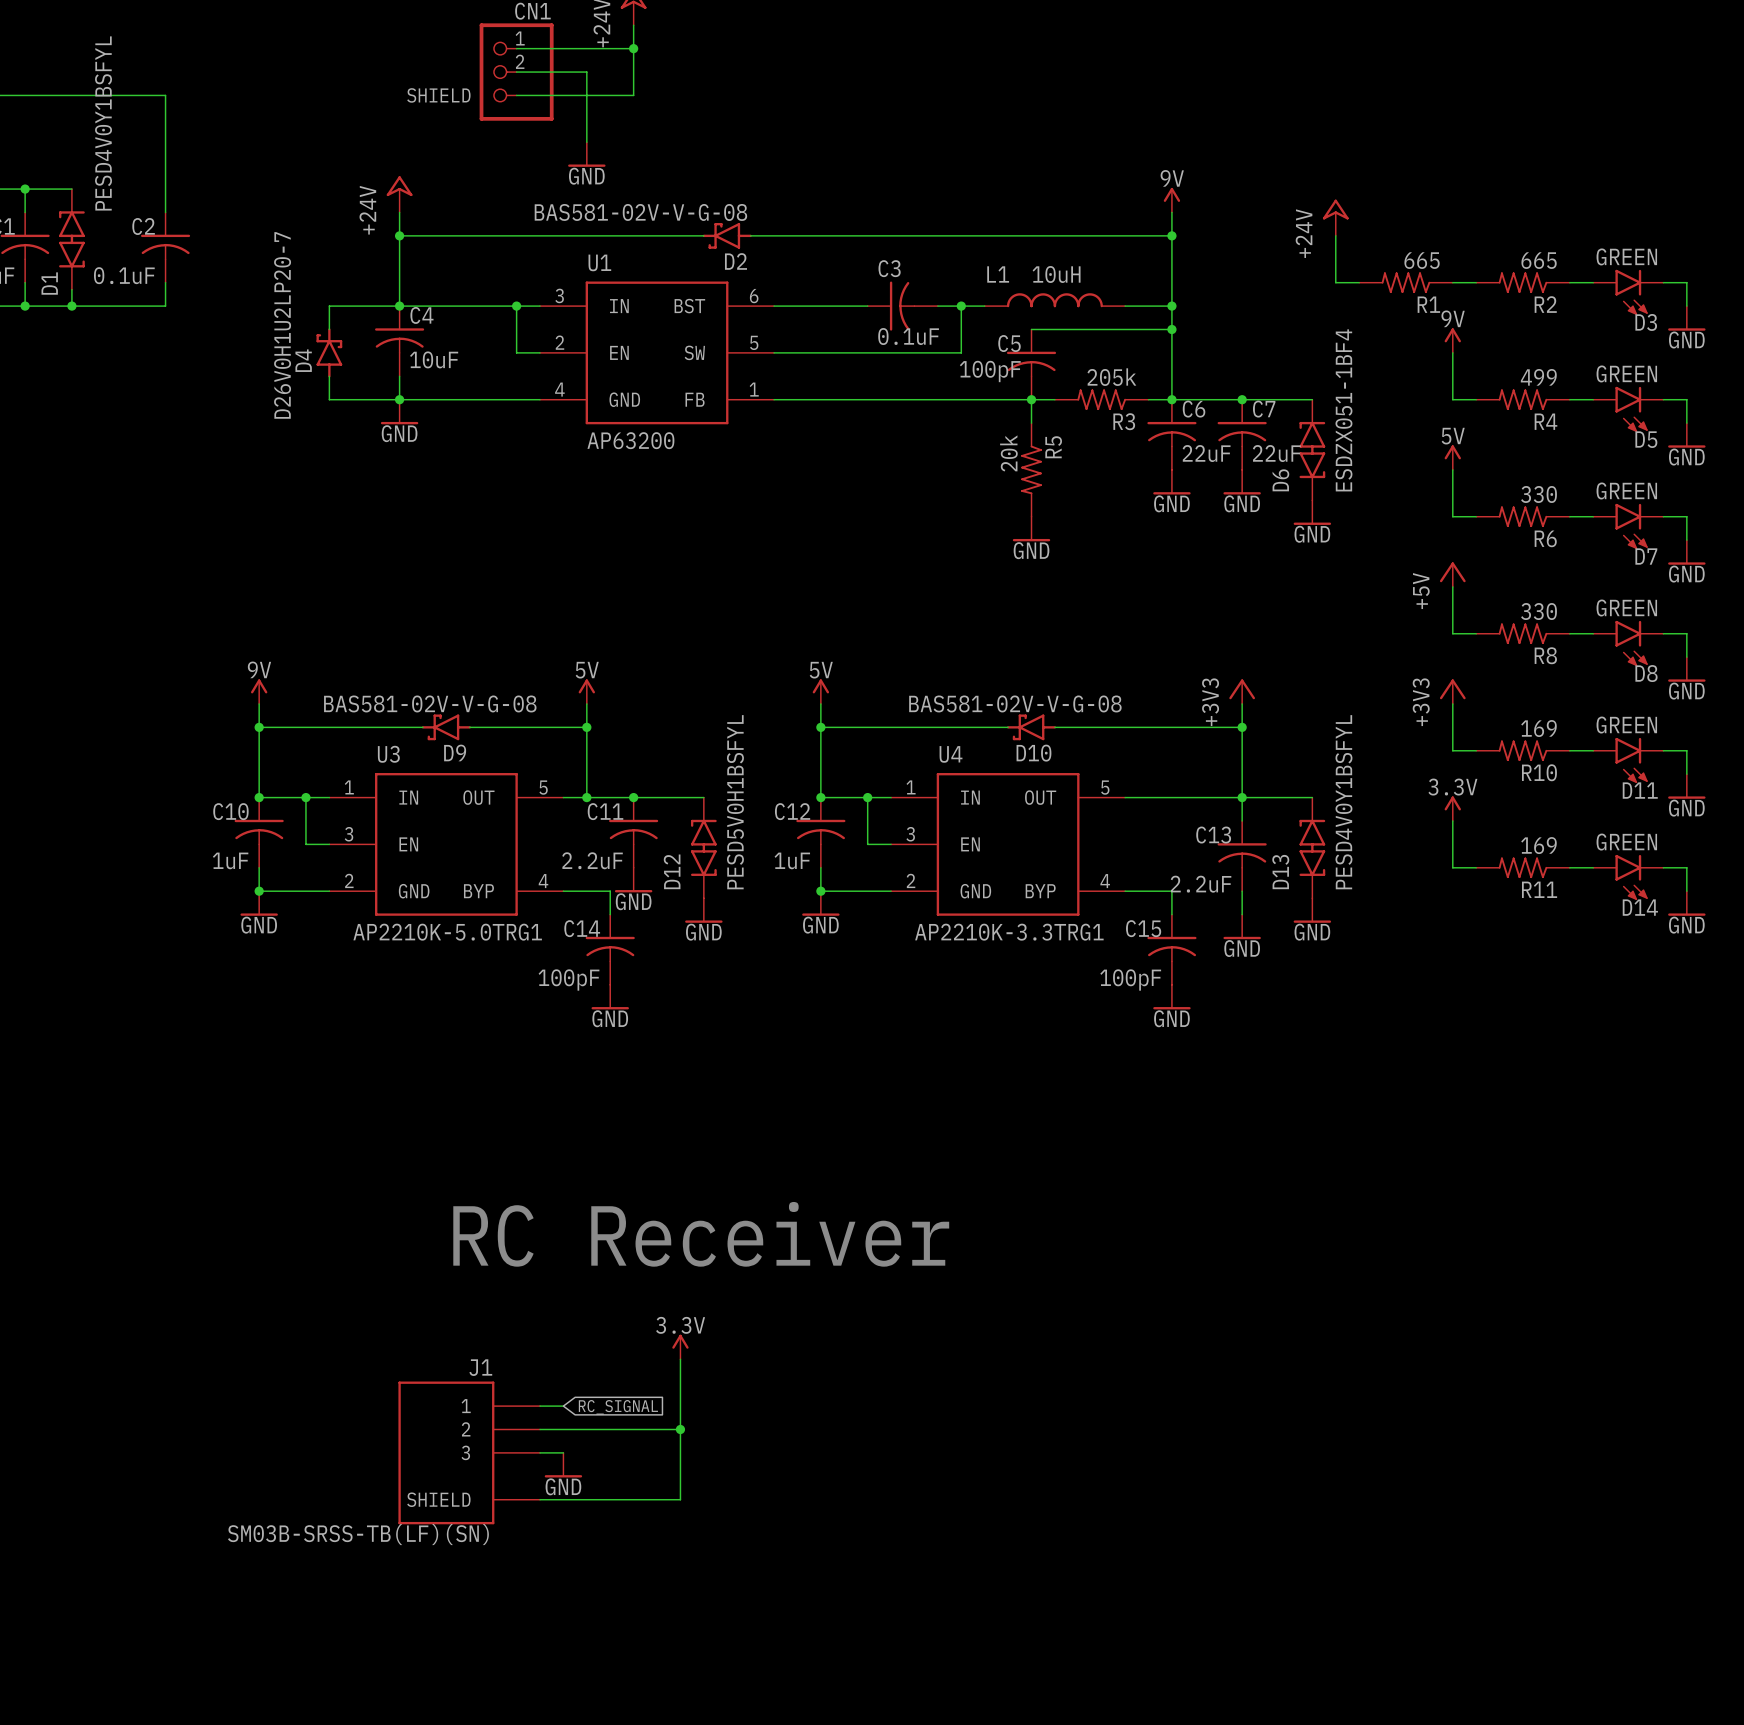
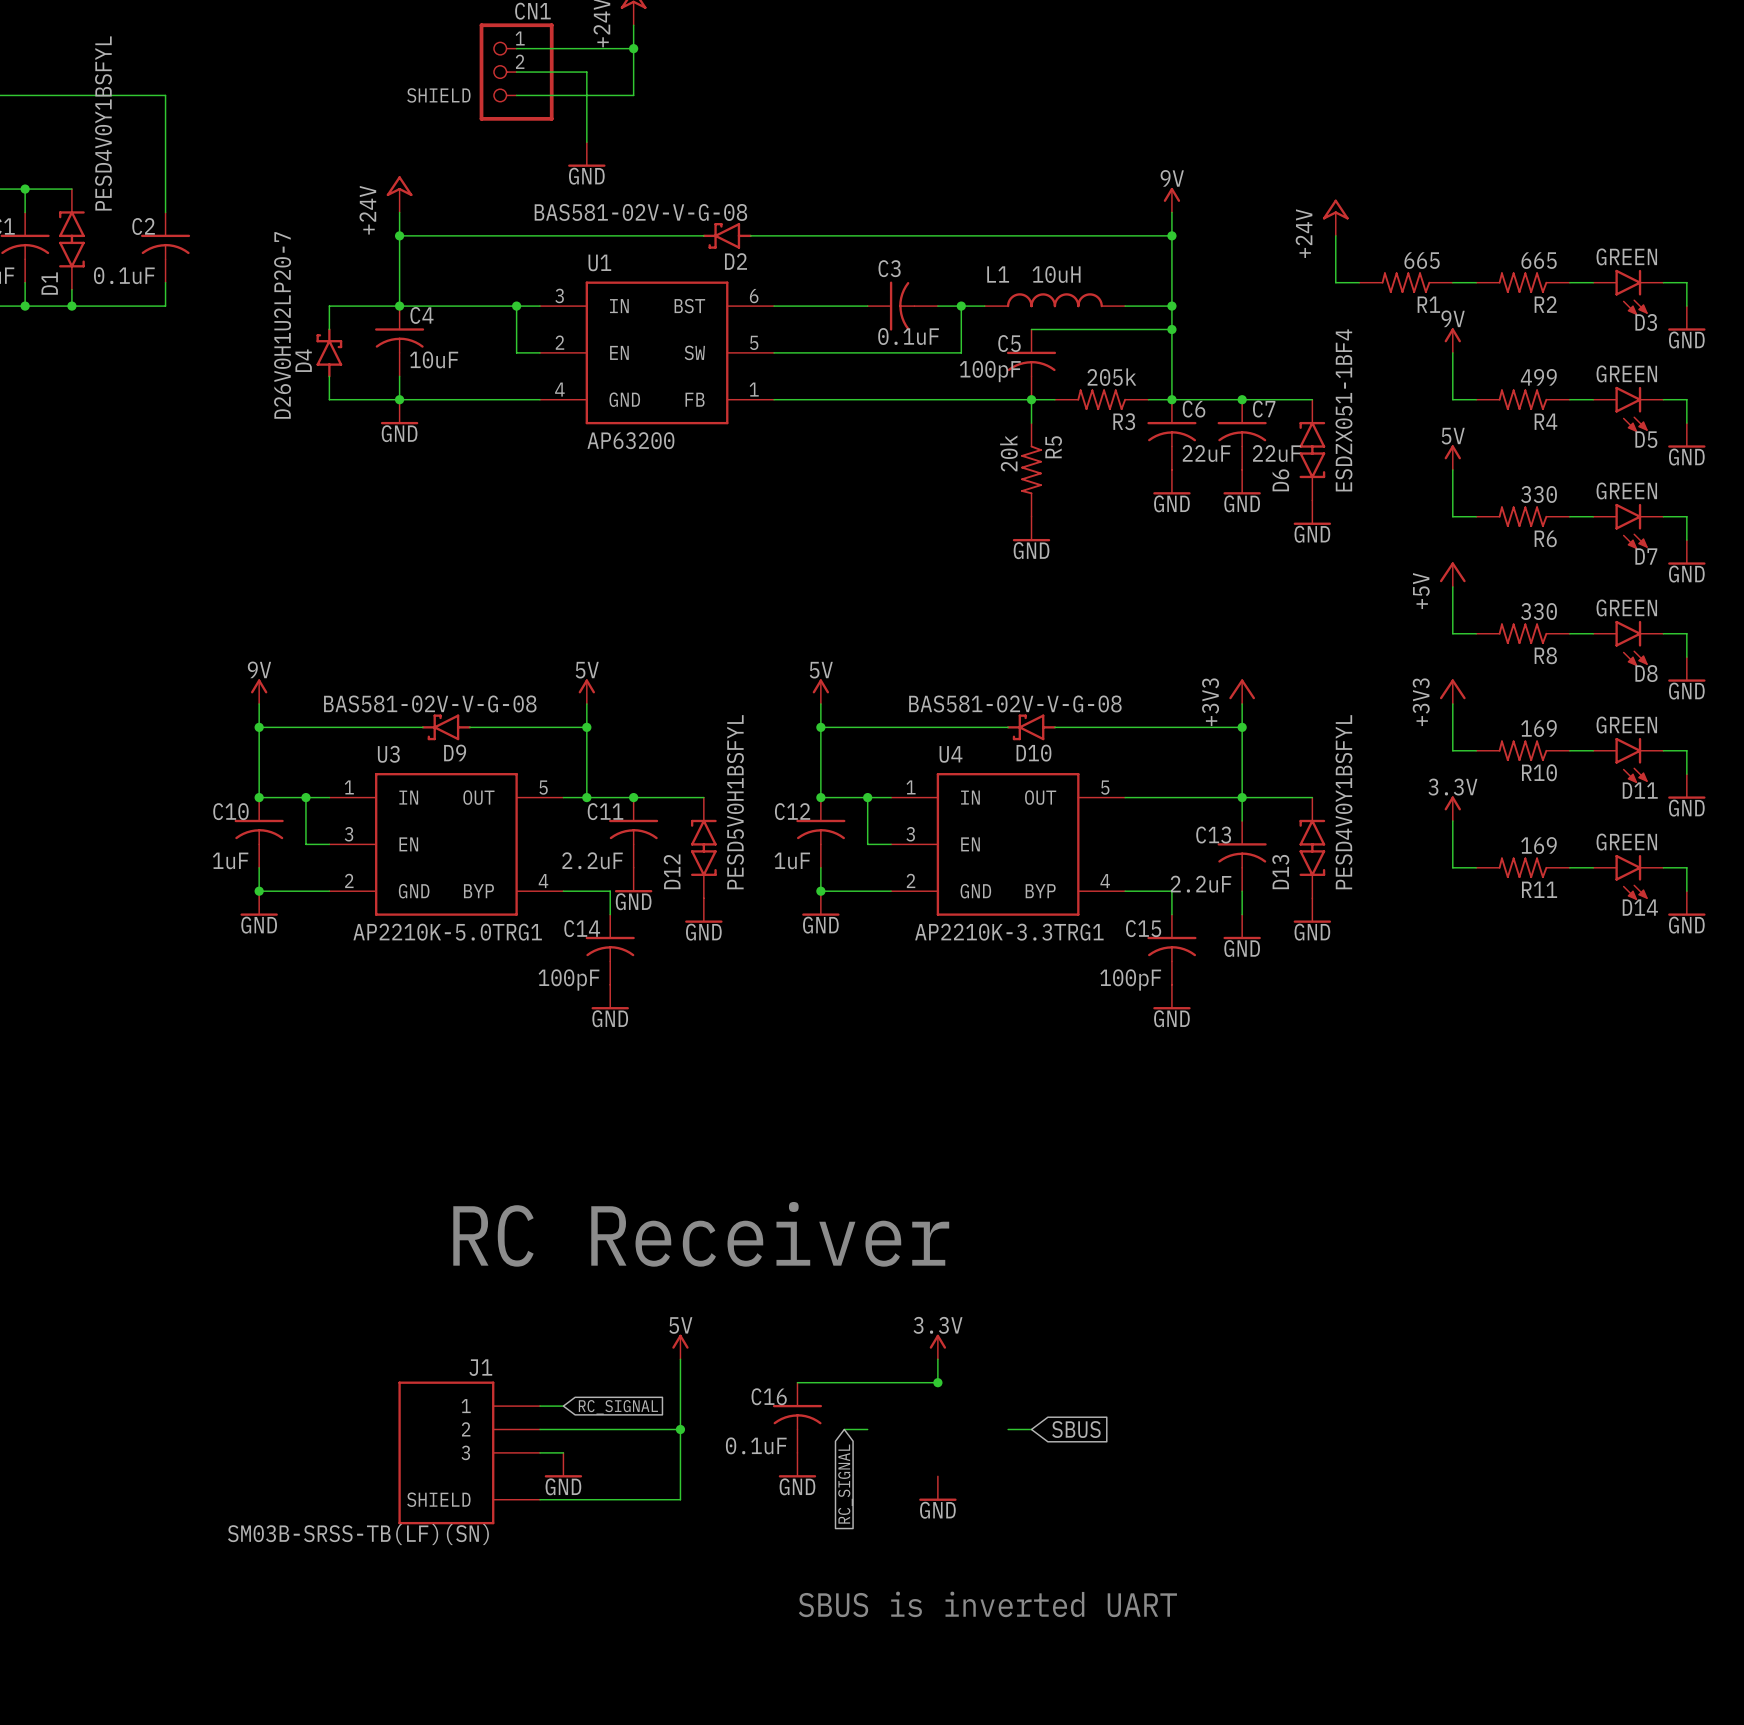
power symbol: 3.3V (680, 1347) -> 5V (680, 1347)
power symbol: none -> 3.3V (937, 1347)
wire: none -> (937, 1359) (937, 1382) (797, 1382)
junction: none -> (937, 1382)
C16: none -> 0.1uF (797, 1417)
wire: none -> (844, 1429) (867, 1429)
wire: none -> (1008, 1429) (1031, 1429)
global label: none -> SBUS (1076, 1429)
power symbol: none -> GND (797, 1465)
global label: none -> RC_SIGNAL (845, 1484)
power symbol: none -> GND (937, 1488)
text: none -> SBUS is inverted UART (987, 1604)

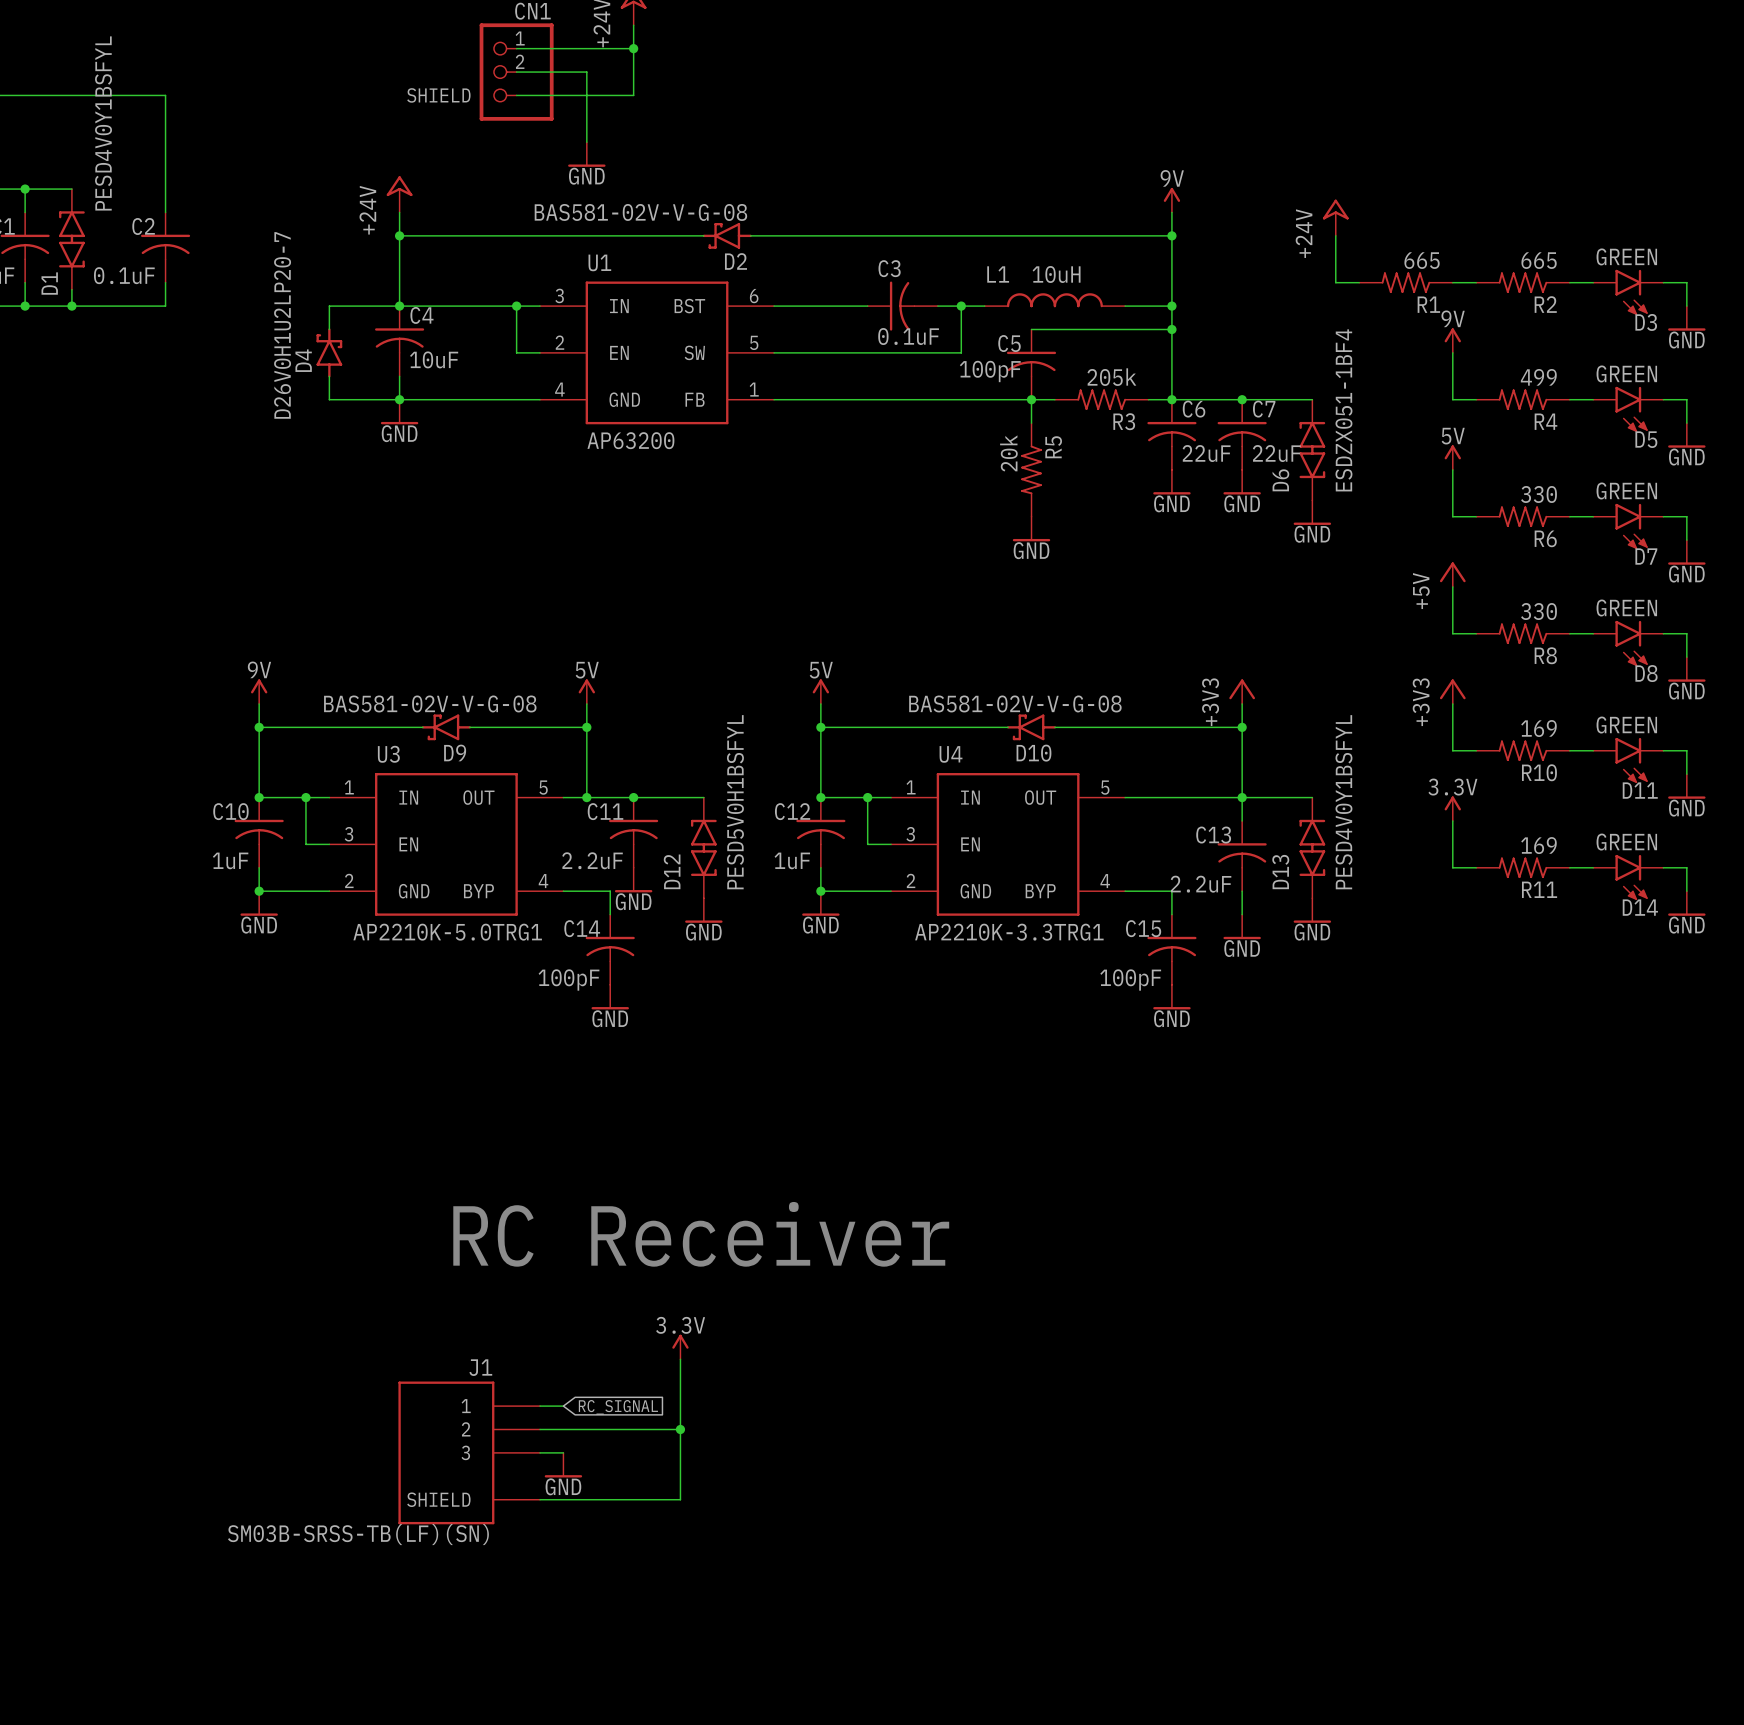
power symbol: 5V (680, 1347) -> 3.3V (680, 1347)
power symbol: 3.3V (937, 1347) -> none
wire: (937, 1359) (937, 1382) (797, 1382) -> none
junction: (937, 1382) -> none
C16: 0.1uF (797, 1417) -> none
wire: (844, 1429) (867, 1429) -> none
wire: (1008, 1429) (1031, 1429) -> none
global label: SBUS (1076, 1429) -> none
power symbol: GND (797, 1465) -> none
global label: RC_SIGNAL (845, 1484) -> none
power symbol: GND (937, 1488) -> none
text: SBUS is inverted UART (987, 1604) -> none

